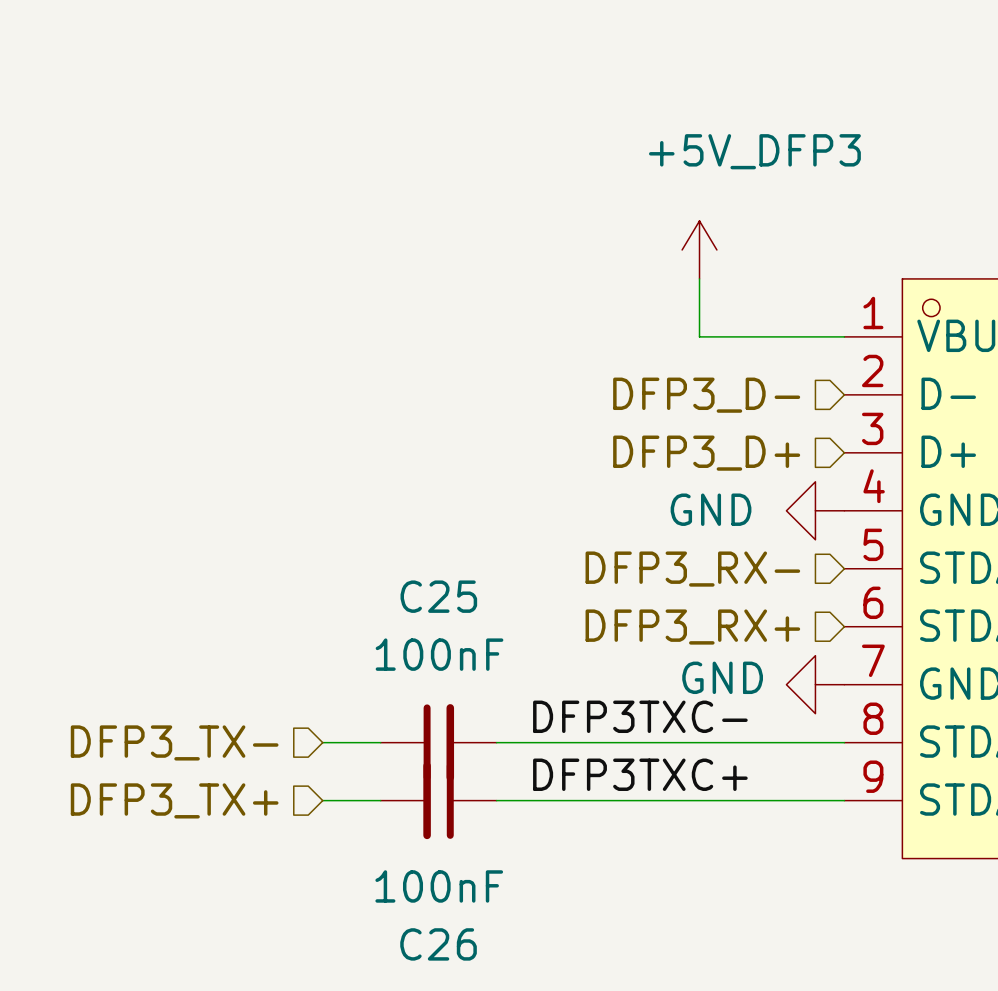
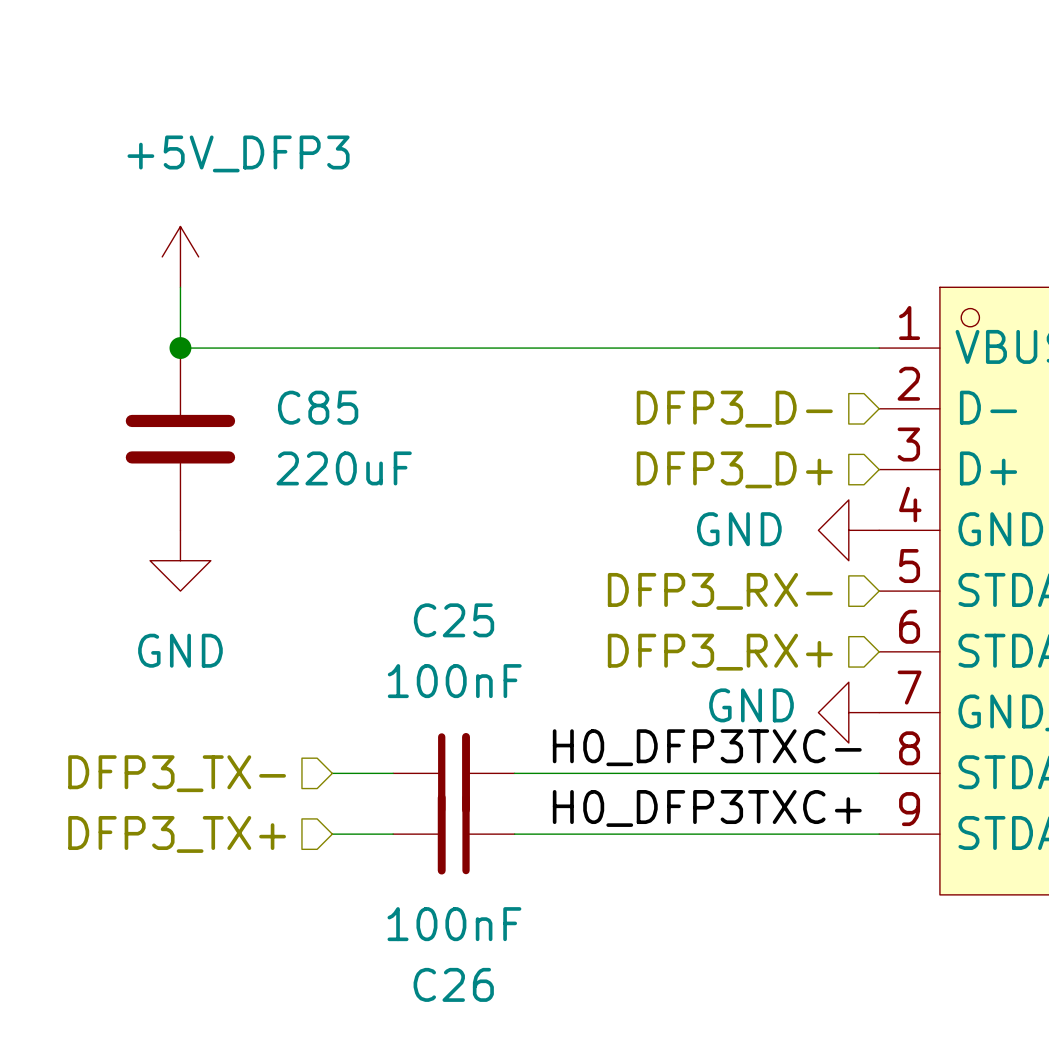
power symbol position: +5V_DFP3 (699, 249) -> +5V_DFP3 (180, 256)
wire: (699, 278) (699, 336) -> (180, 287) (180, 348) (727, 348)
junction: none -> (180, 348)
C85: none -> 220uF (180, 439)
power symbol: none -> GND (180, 560)
label: DFP3TXC- (640, 716) -> H0_DFP3TXC- (707, 747)
label: DFP3TXC+ (640, 774) -> H0_DFP3TXC+ (707, 808)

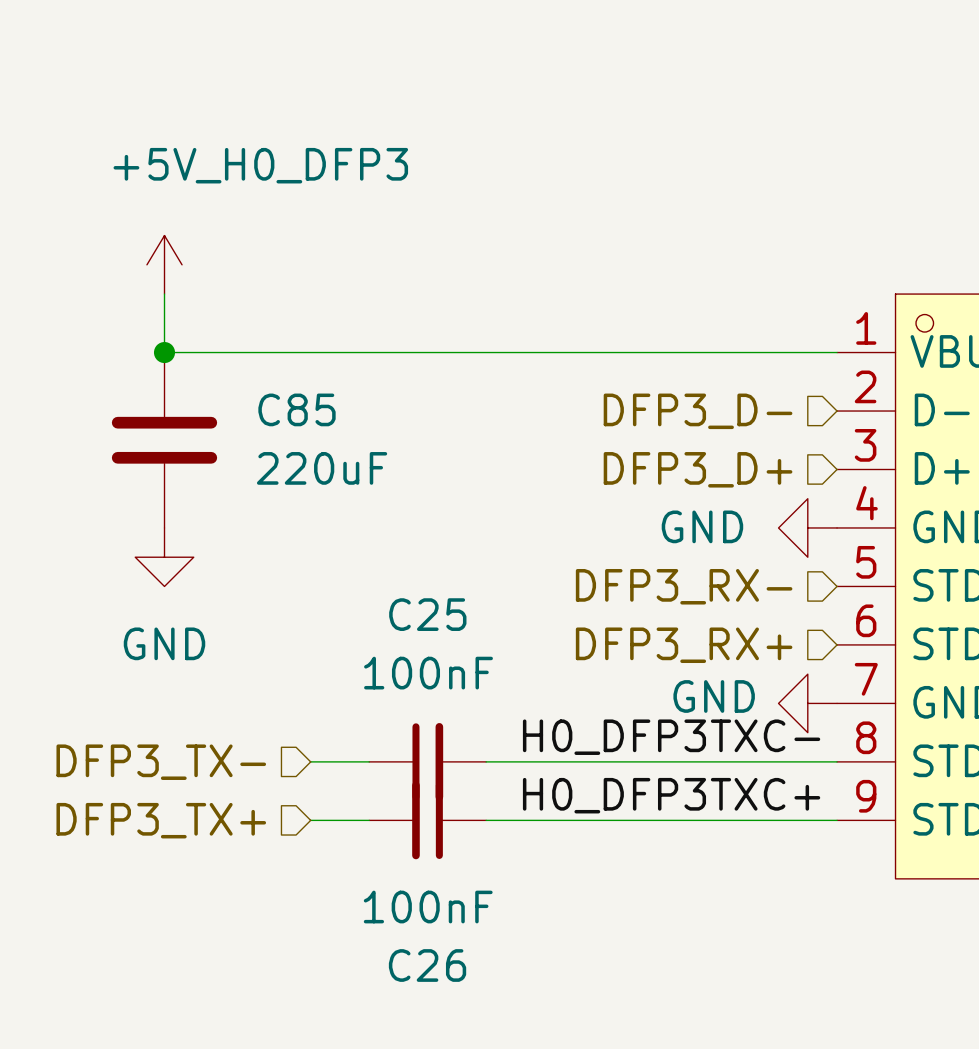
power symbol: +5V_DFP3 (180, 256) -> +5V_H0_DFP3 (164, 264)

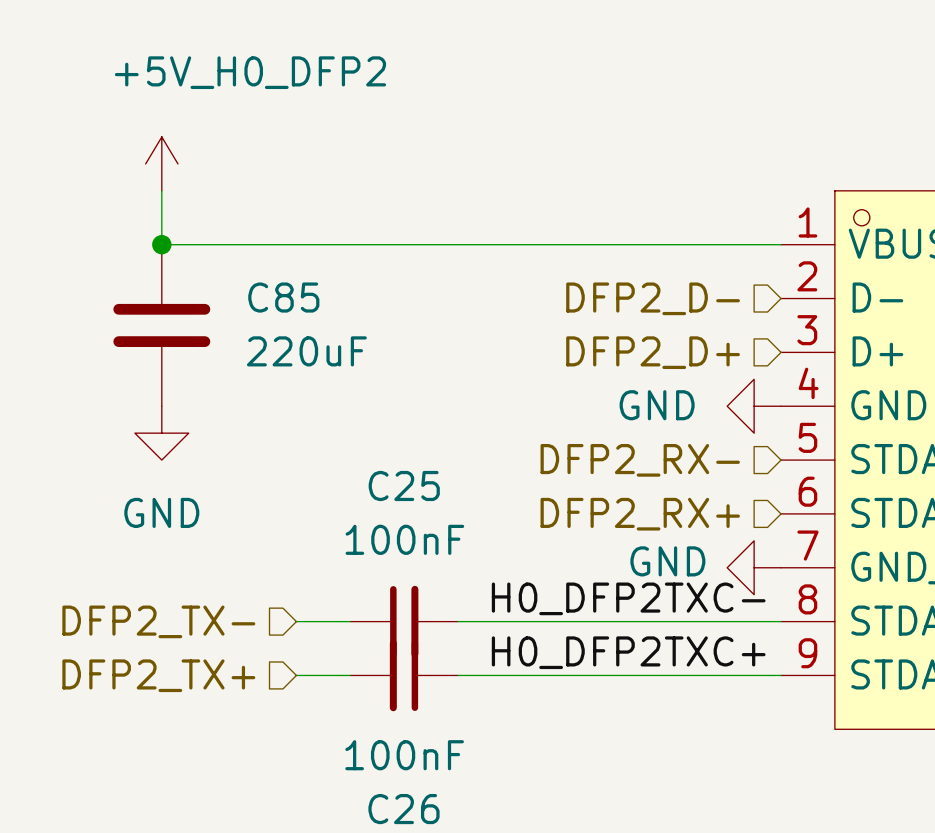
power symbol: +5V_H0_DFP3 (164, 264) -> +5V_H0_DFP2 (161, 163)
hierarchical label: DFP3_D- (698, 411) -> DFP2_D- (653, 298)
hierarchical label: DFP3_D+ (698, 469) -> DFP2_D+ (653, 352)
hierarchical label: DFP3_RX- (684, 586) -> DFP2_RX- (640, 460)
hierarchical label: DFP3_RX+ (684, 645) -> DFP2_RX+ (640, 514)
label: H0_DFP3TXC- (671, 737) -> H0_DFP2TXC- (628, 598)
hierarchical label: DFP3_TX- (161, 762) -> DFP2_TX- (158, 621)
label: H0_DFP3TXC+ (671, 795) -> H0_DFP2TXC+ (628, 652)
hierarchical label: DFP3_TX+ (161, 820) -> DFP2_TX+ (158, 675)

